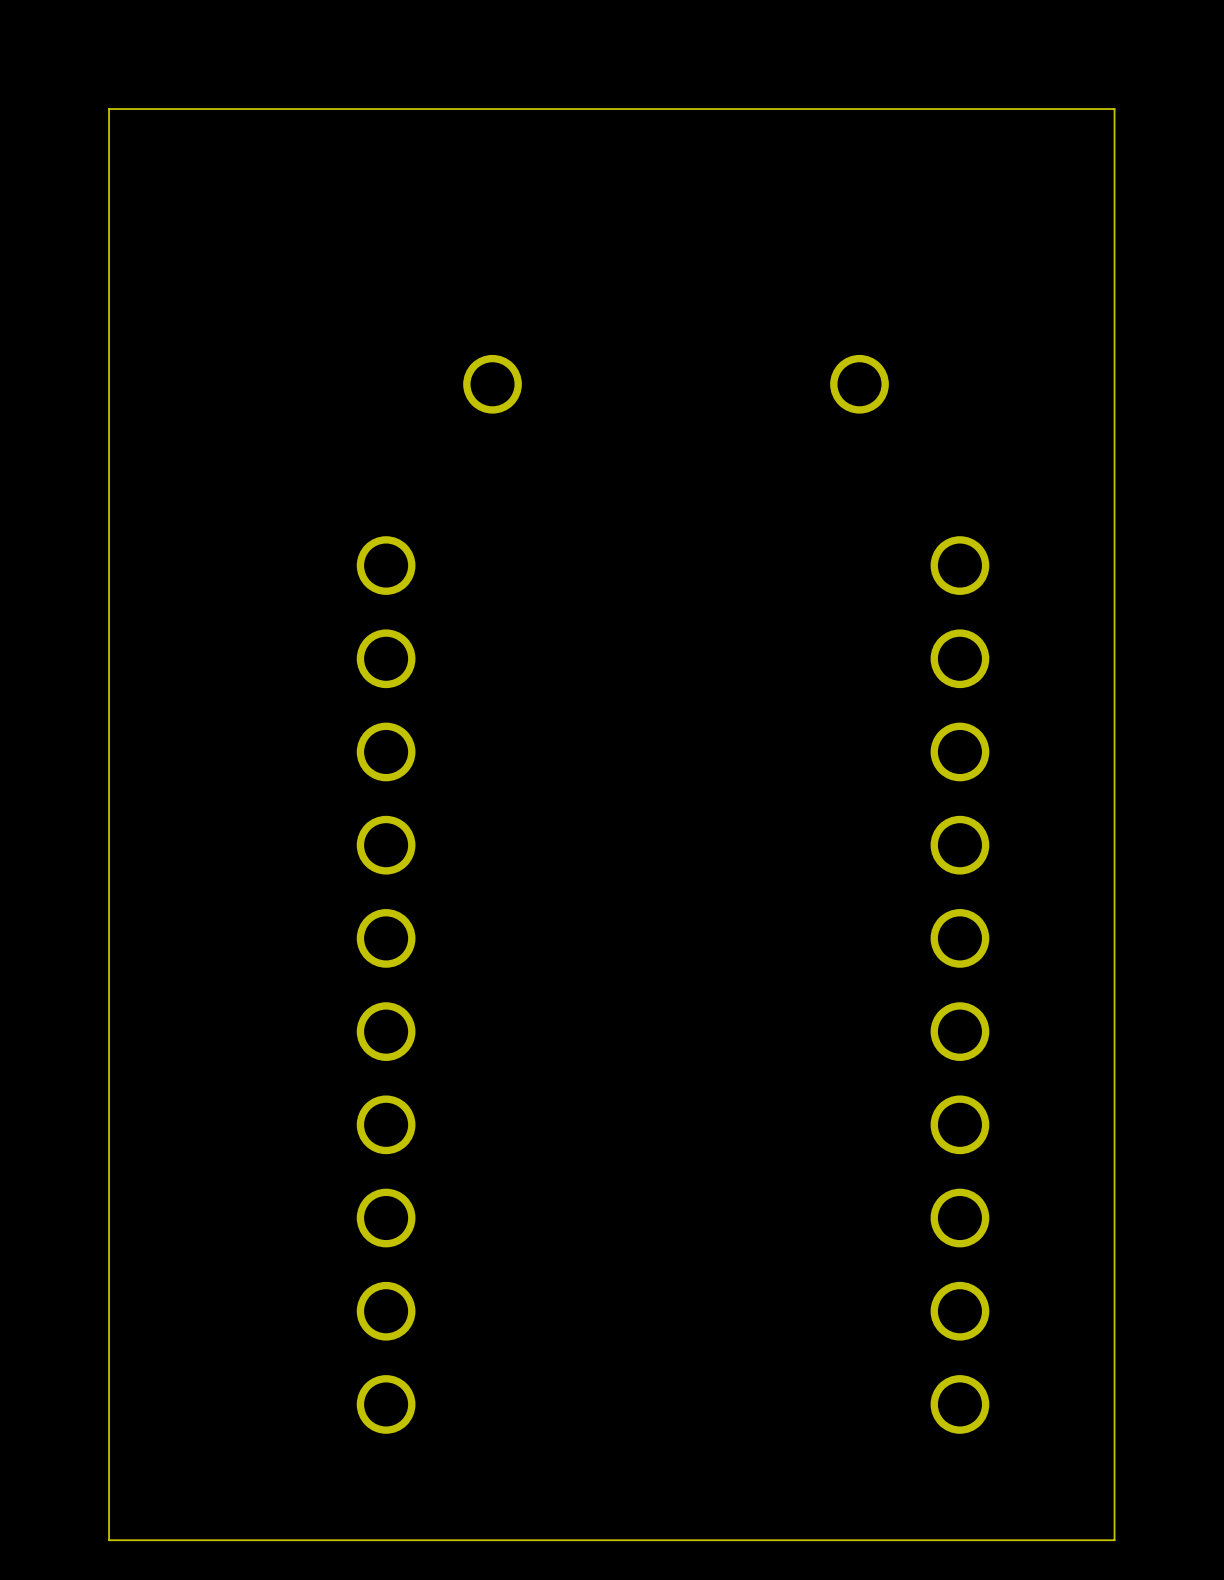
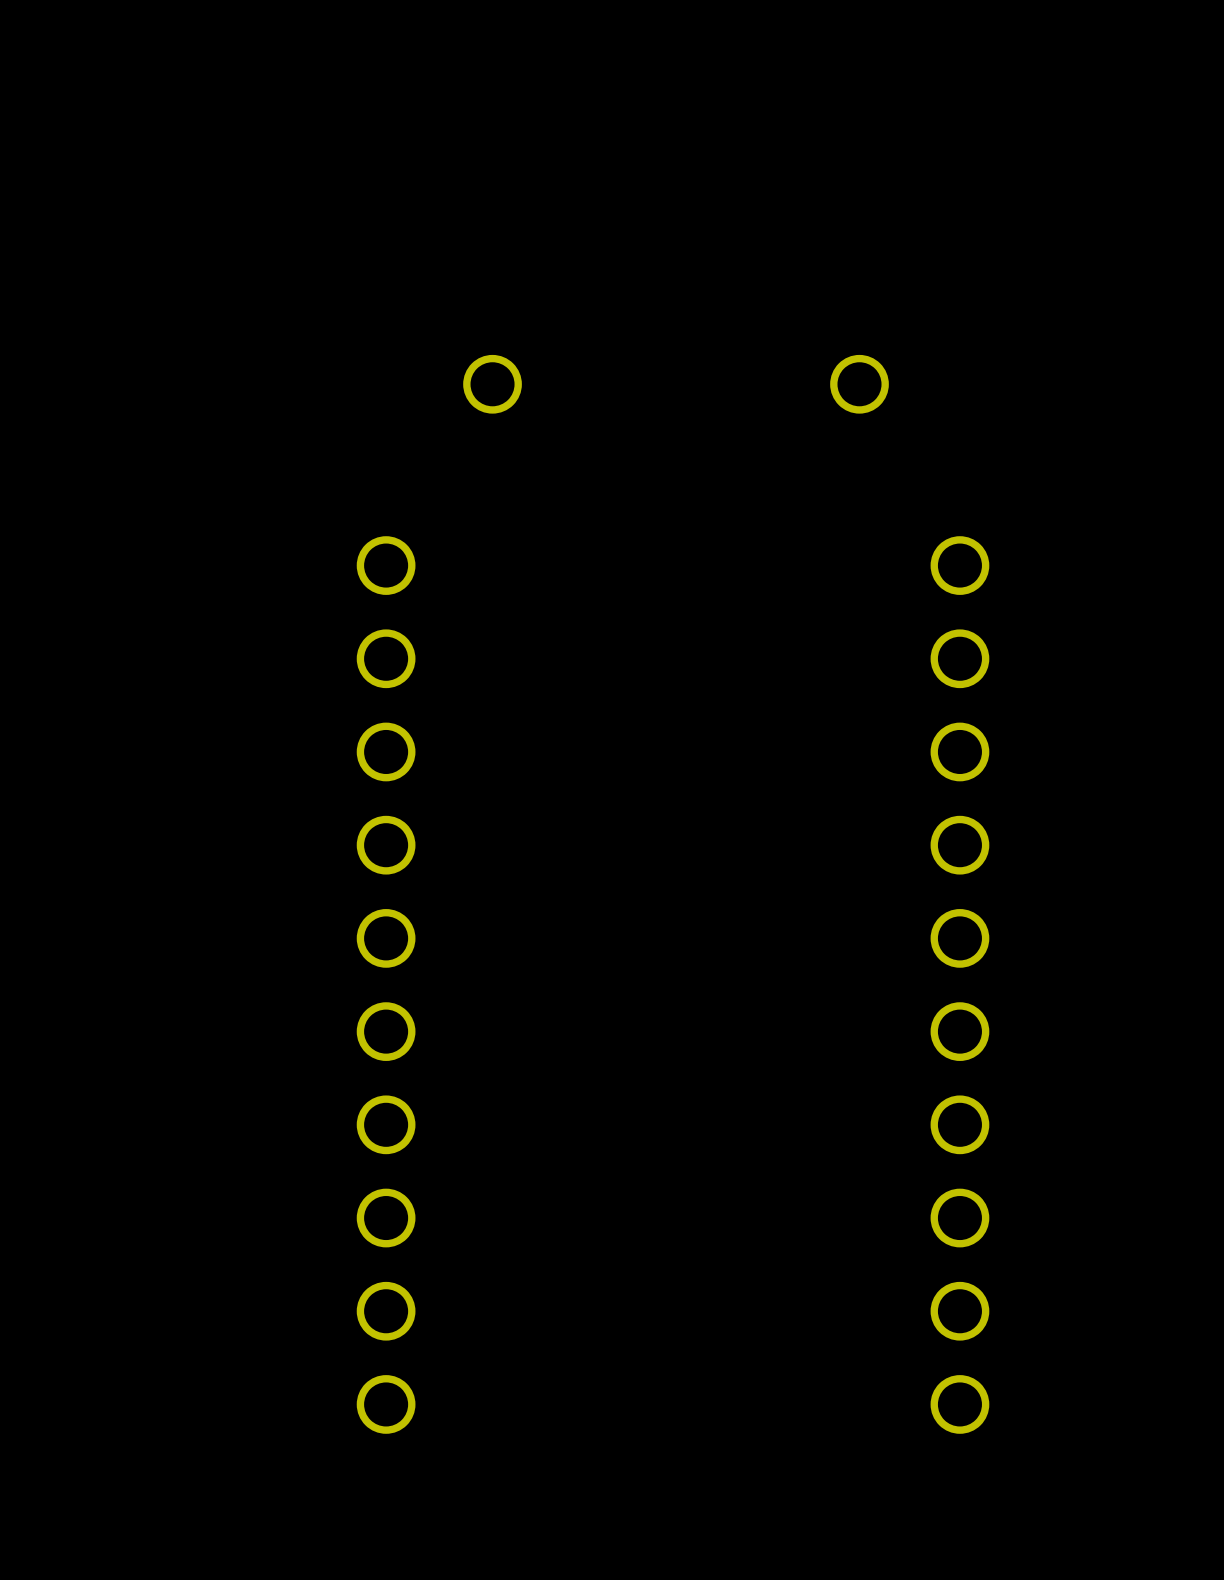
board edge: (1114, 109) (109, 109) (109, 1540) (1114, 1540) (1114, 109) -> none

